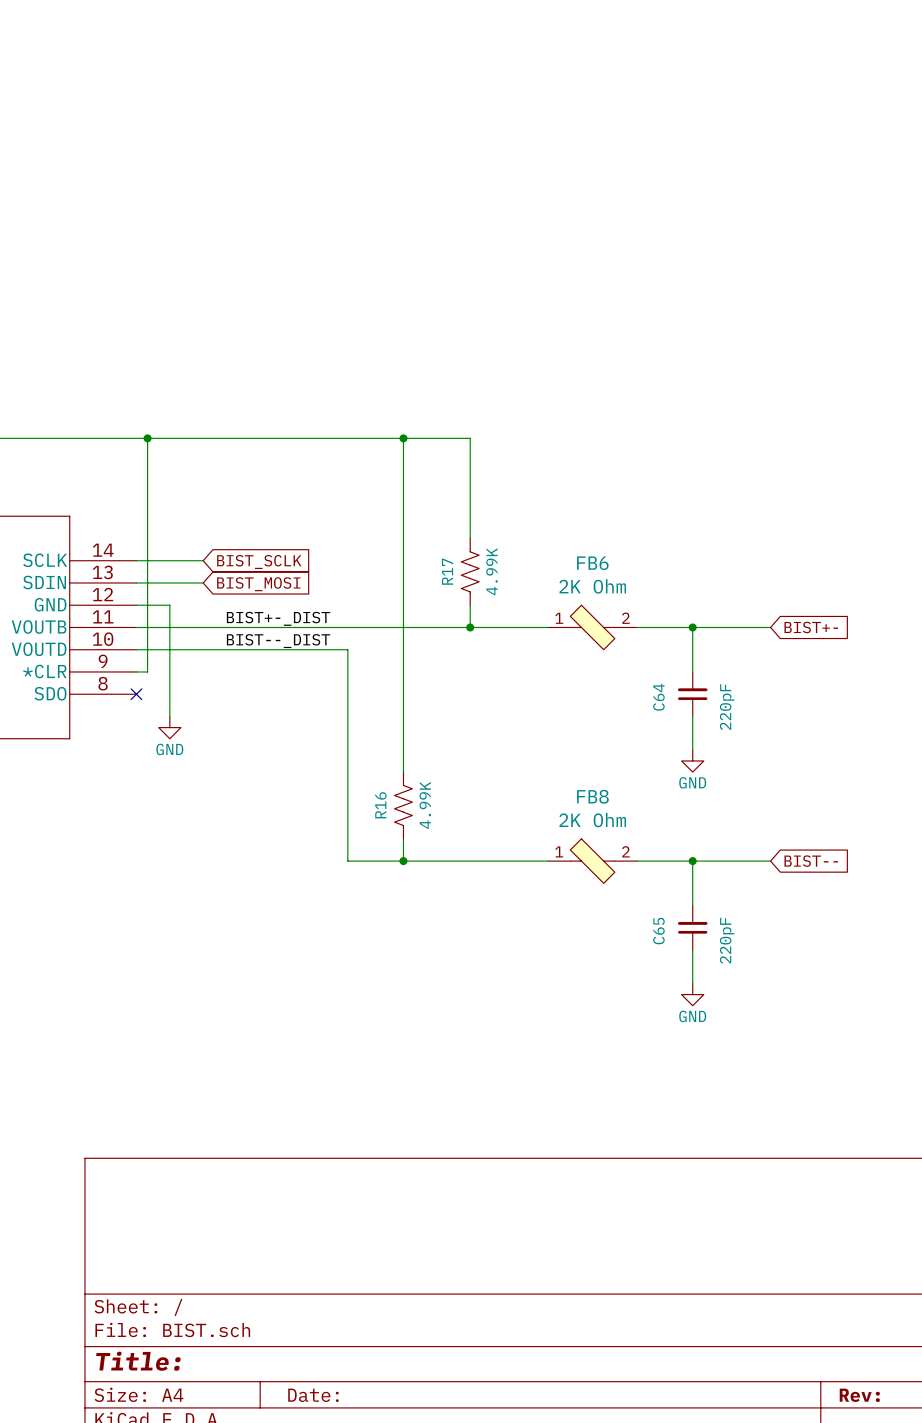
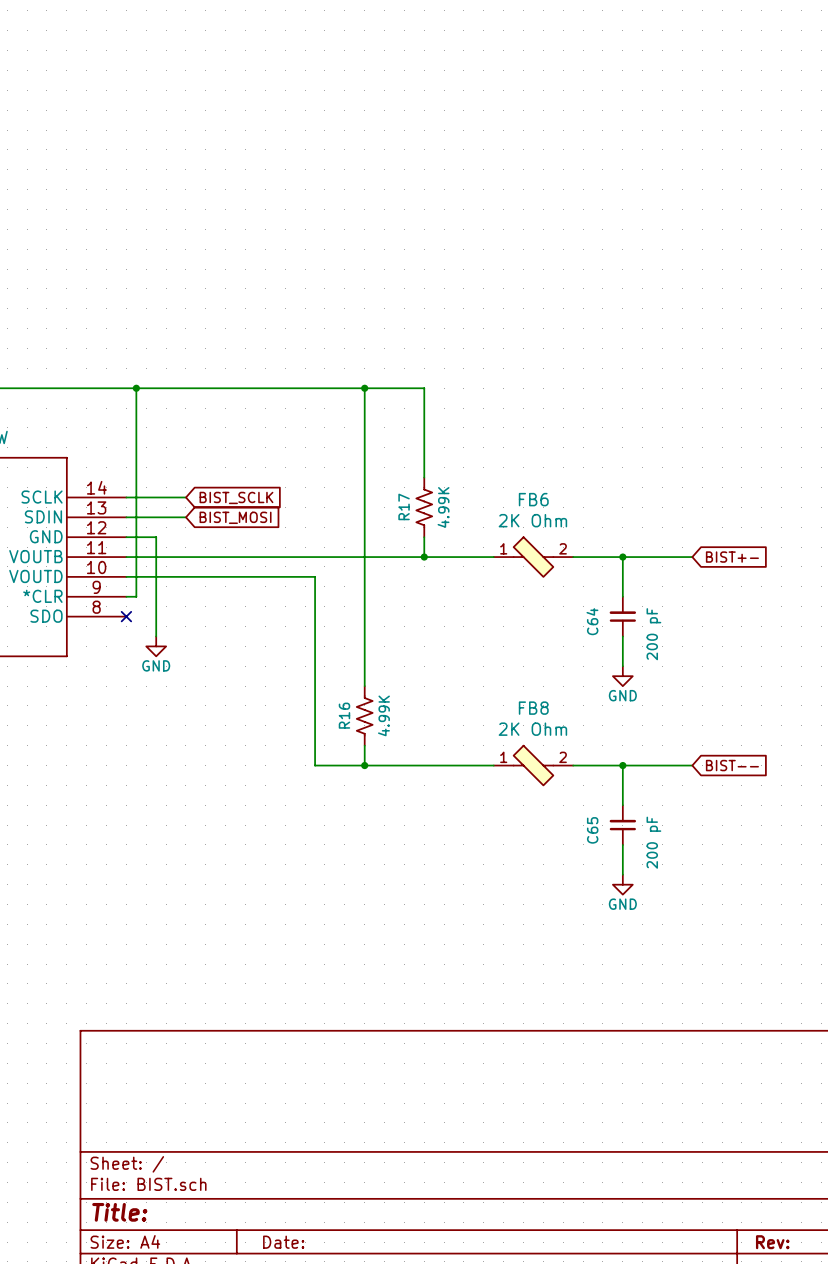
label: BIST+-_DIST (278, 618) -> none
label: BIST--_DIST (278, 641) -> none
C64 value: 220pF (727, 707) -> 200 pF (653, 634)
C65 value: 220pF (727, 940) -> 200 pF (653, 842)

